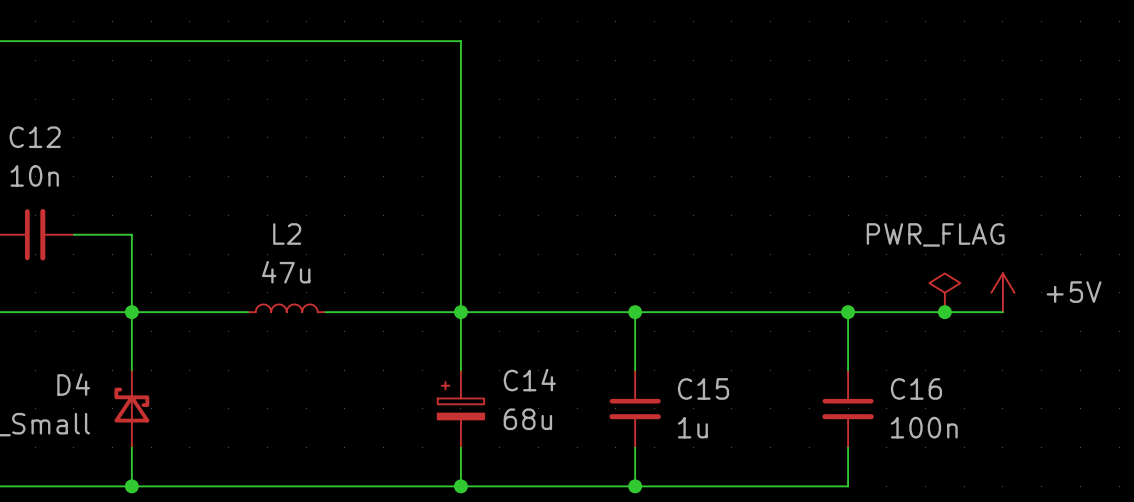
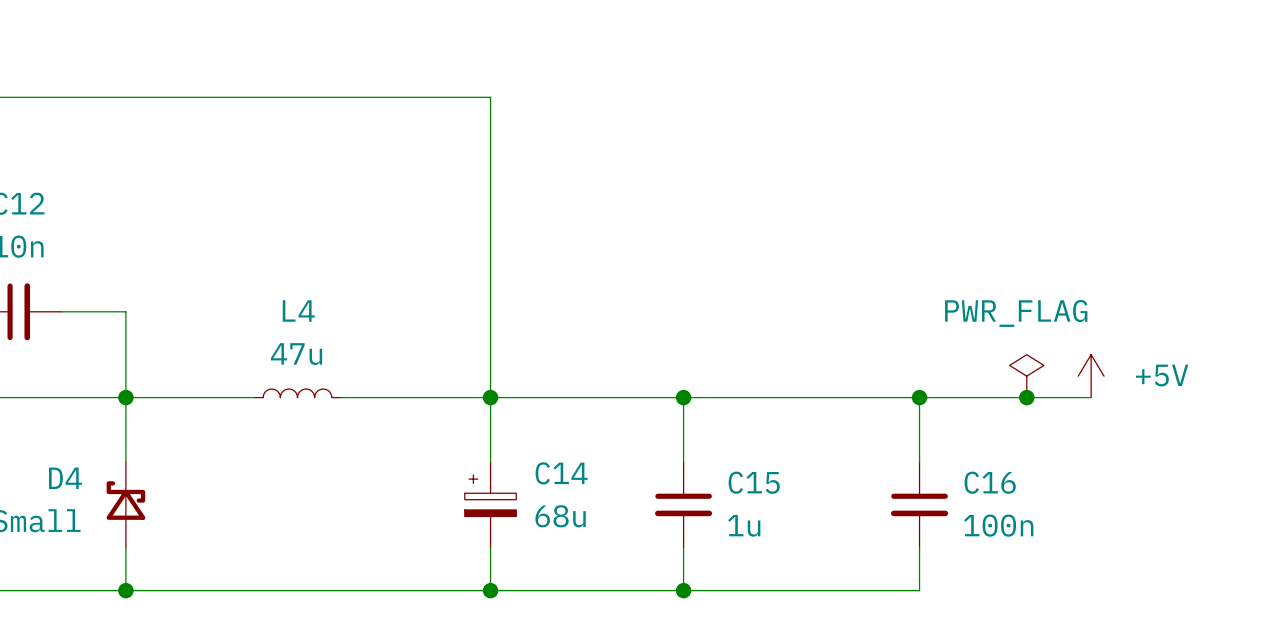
L2 name: L2 (287, 234) -> L4 (298, 310)

